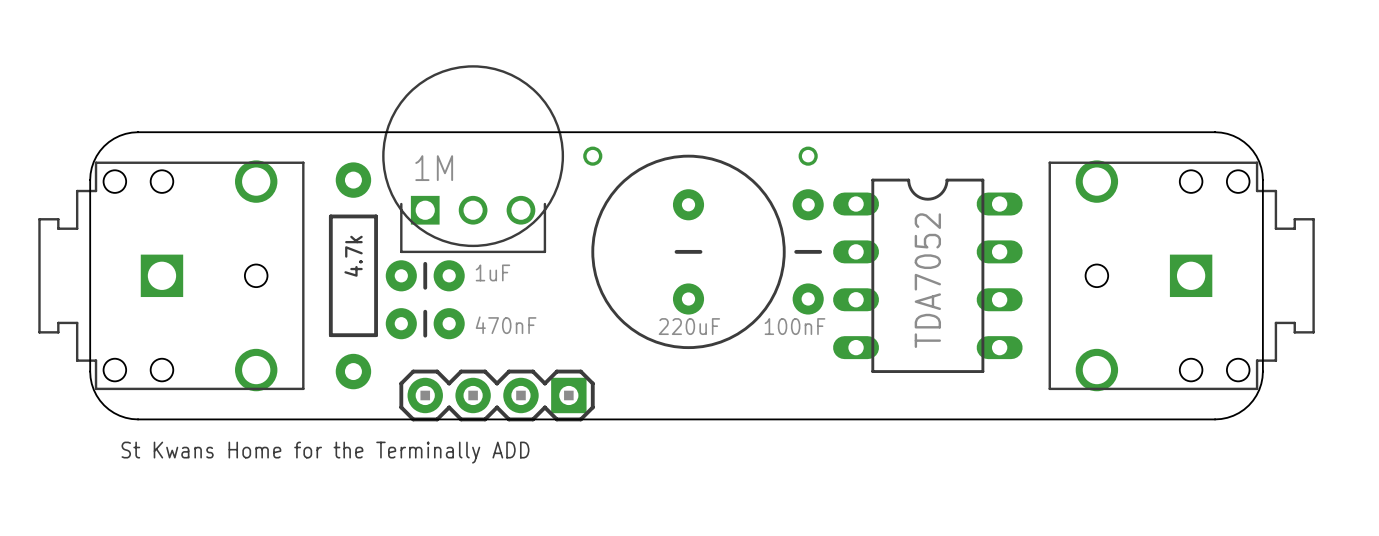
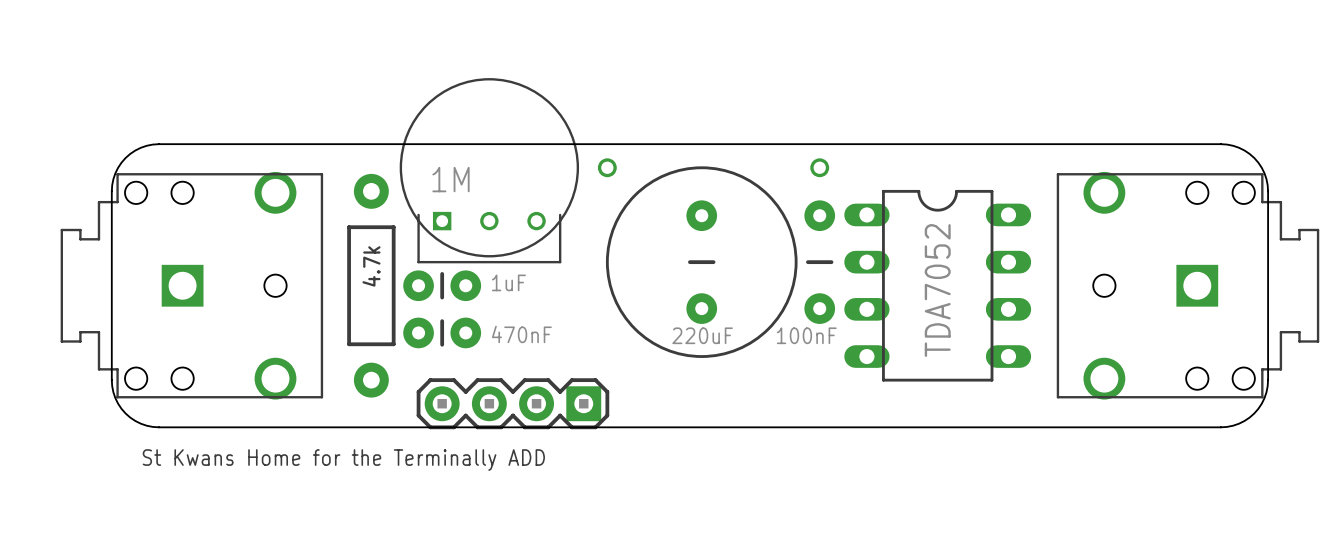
part footprint: [382, 65, 565, 254] -> [399, 78, 580, 264]

